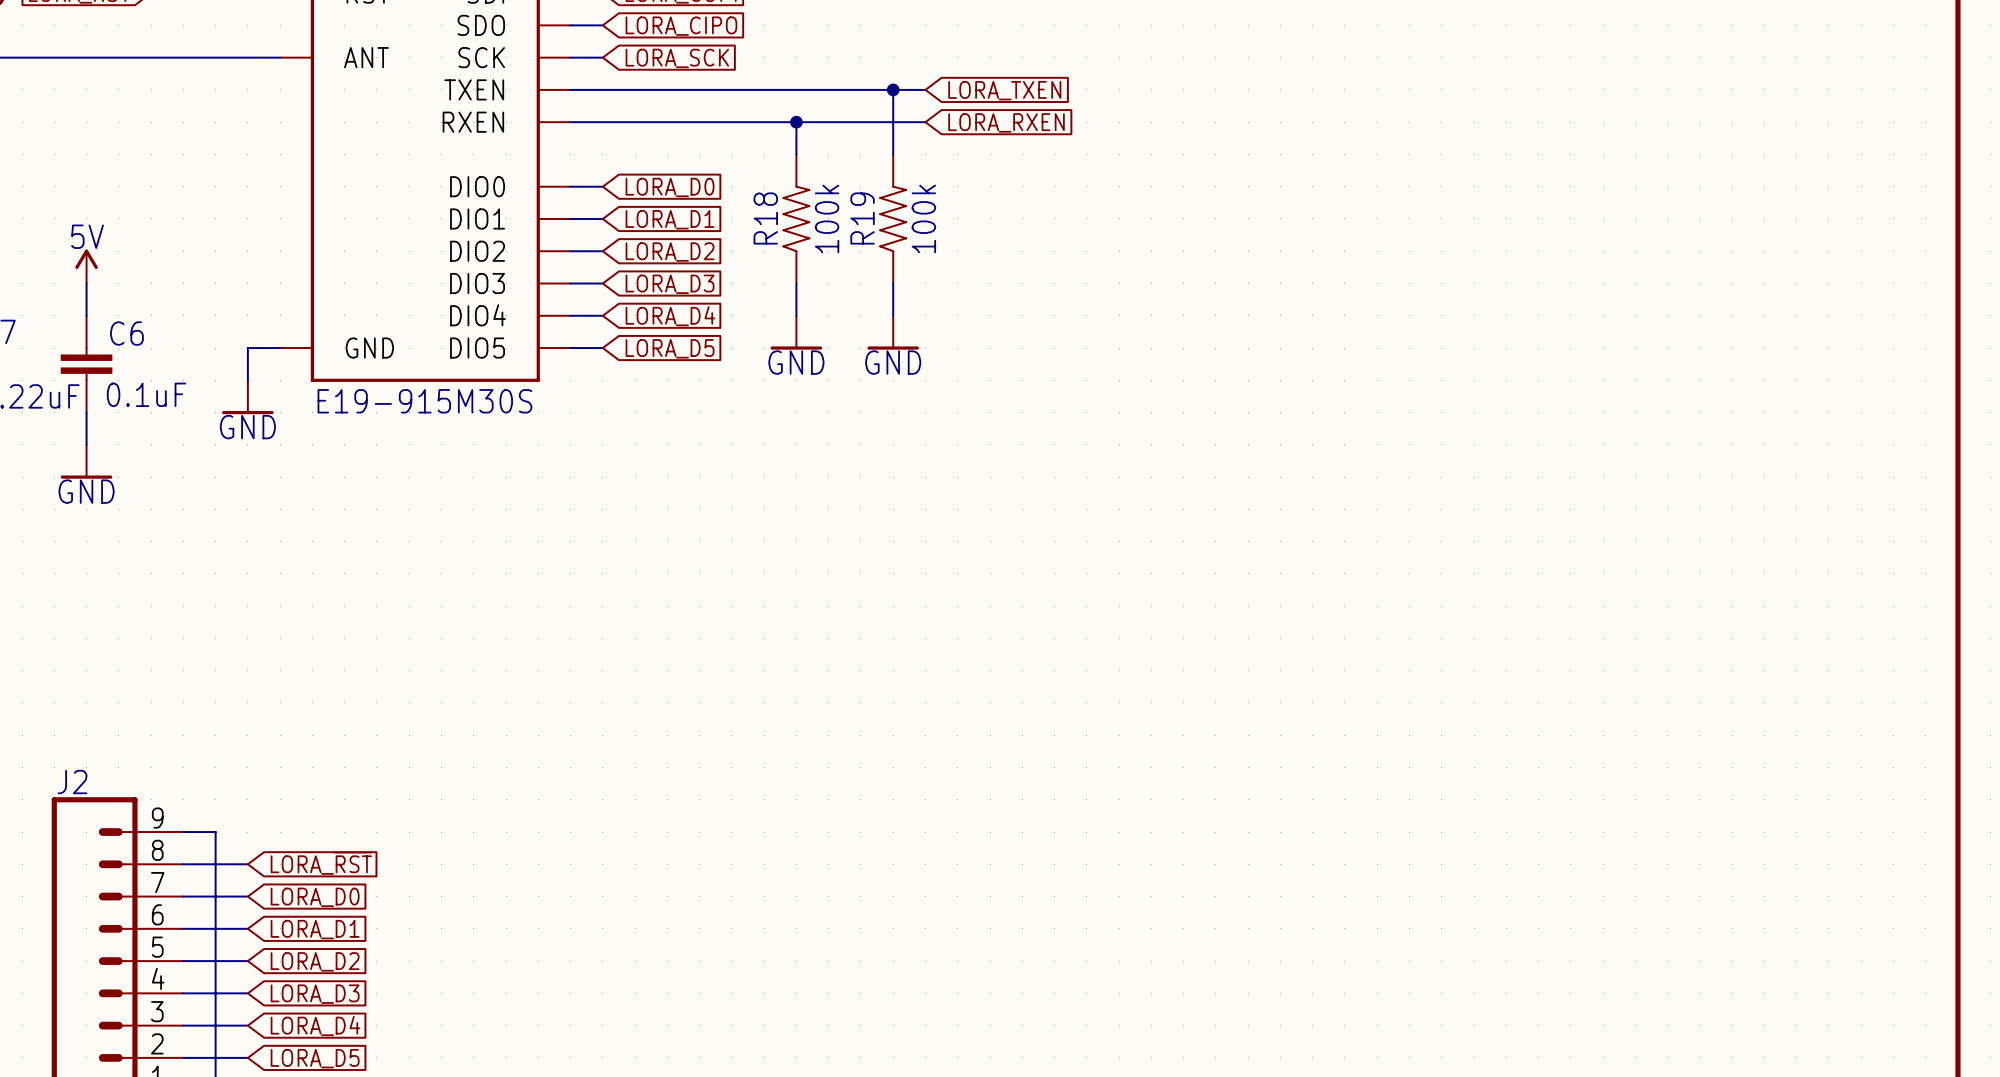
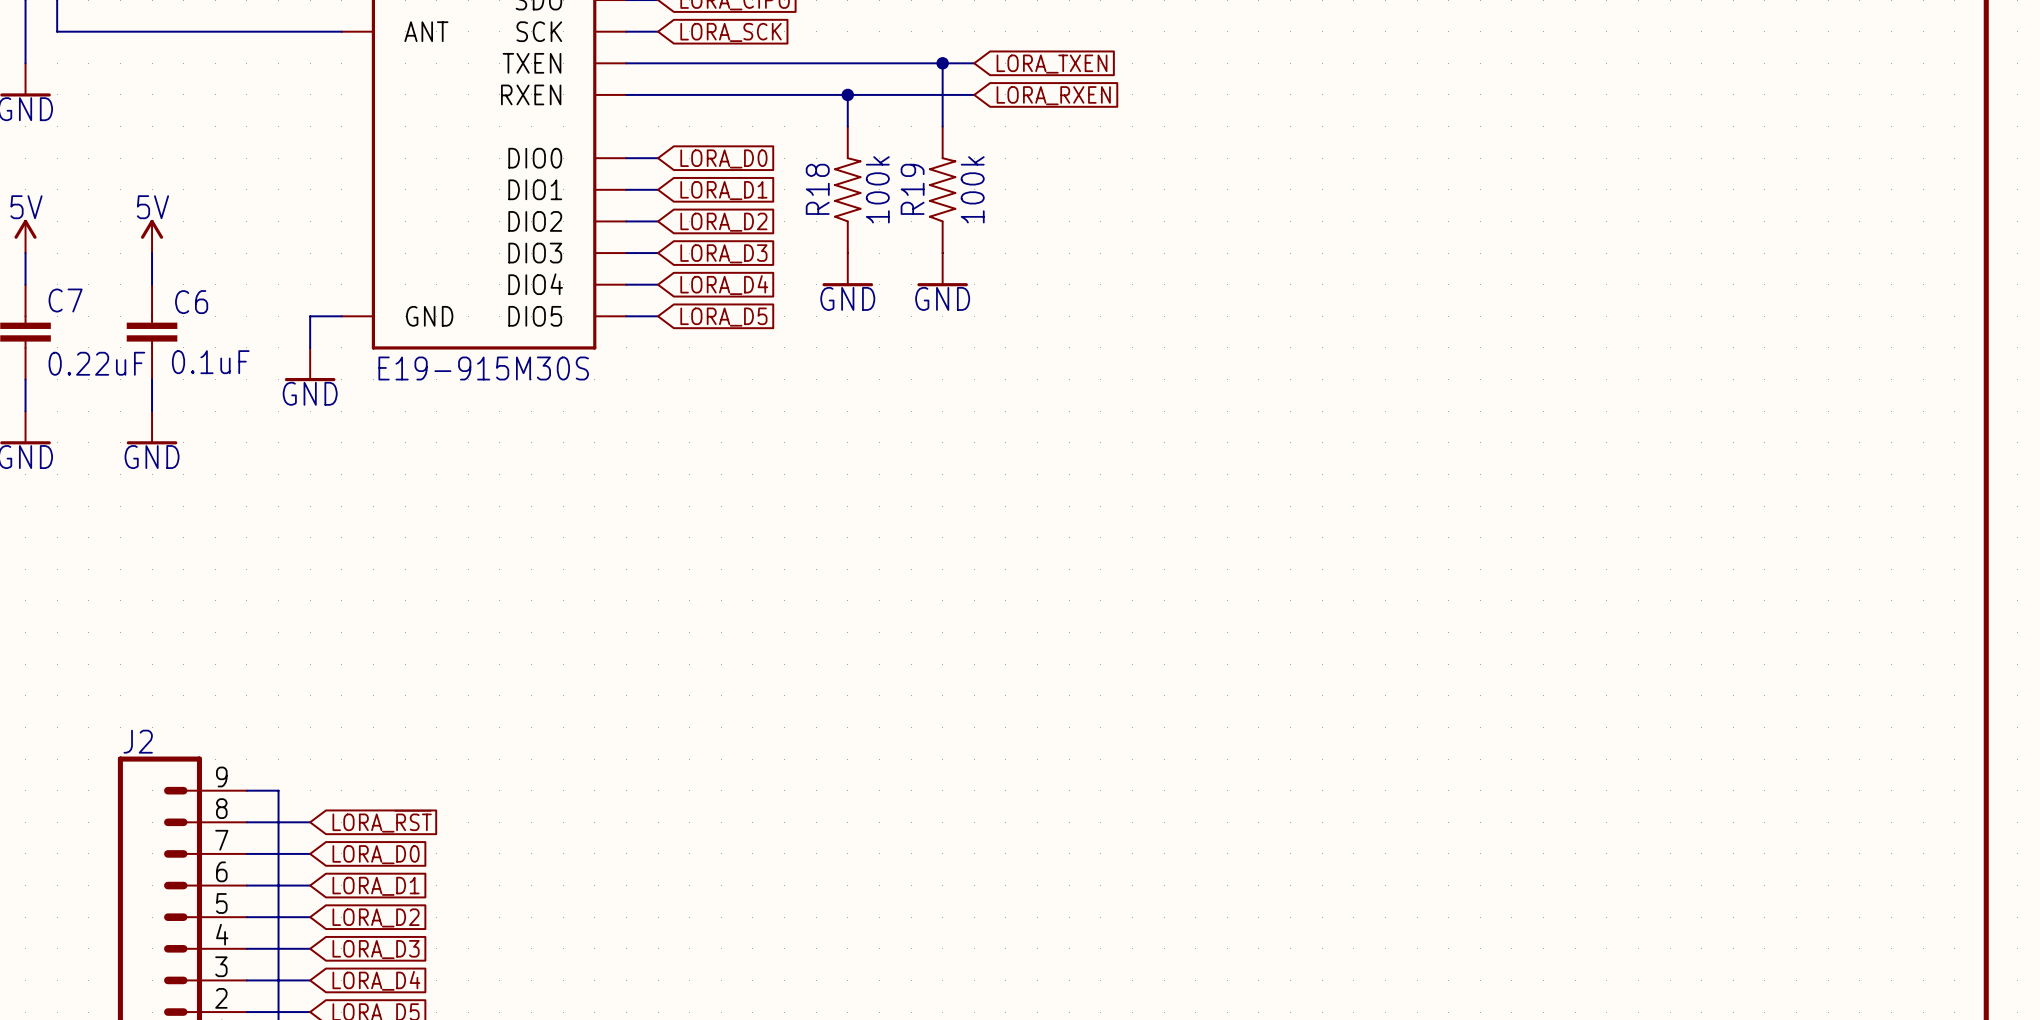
power symbol position: GND (796, 332) -> GND (847, 269)
power symbol position: GND (893, 332) -> GND (942, 269)

